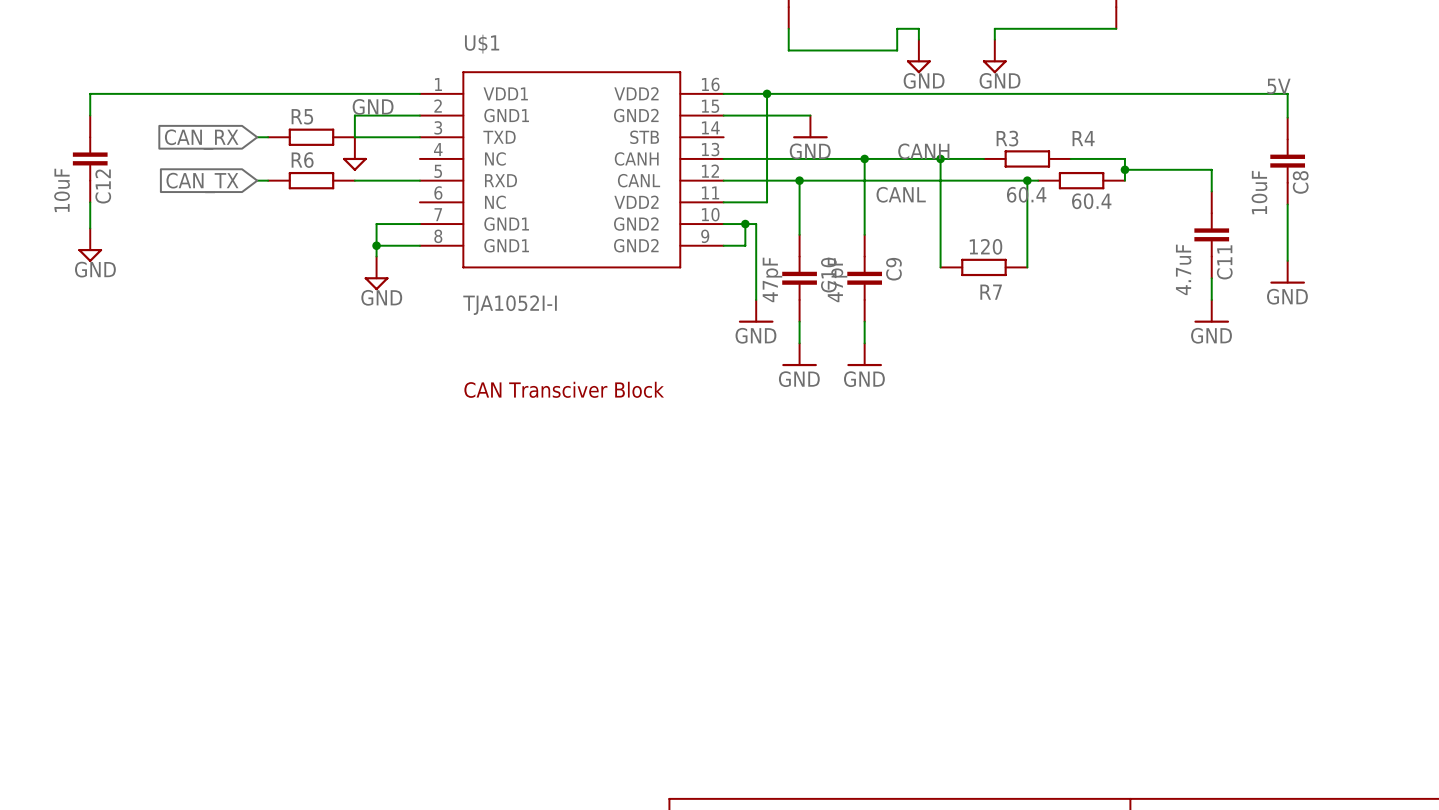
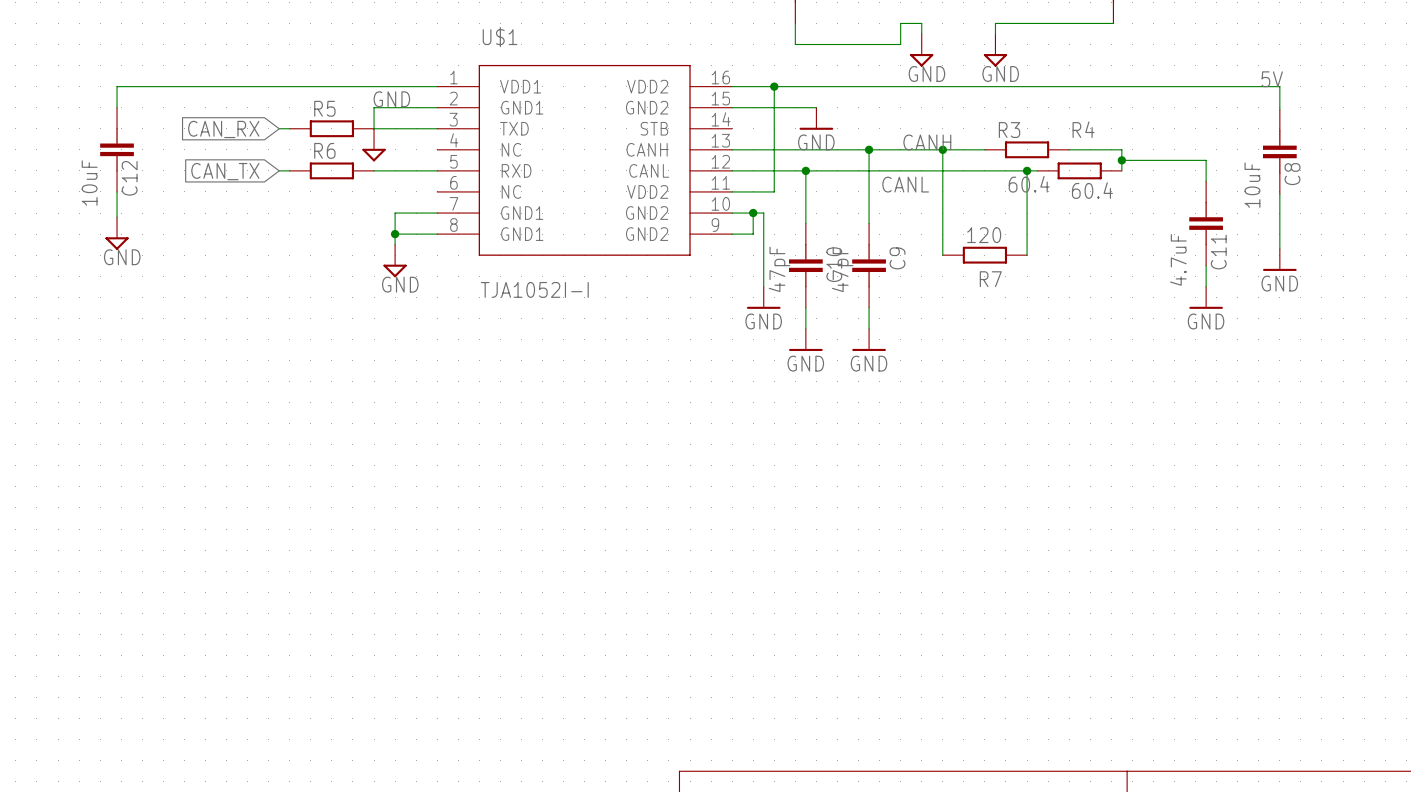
text: CAN Transciver Block (564, 389) -> none

